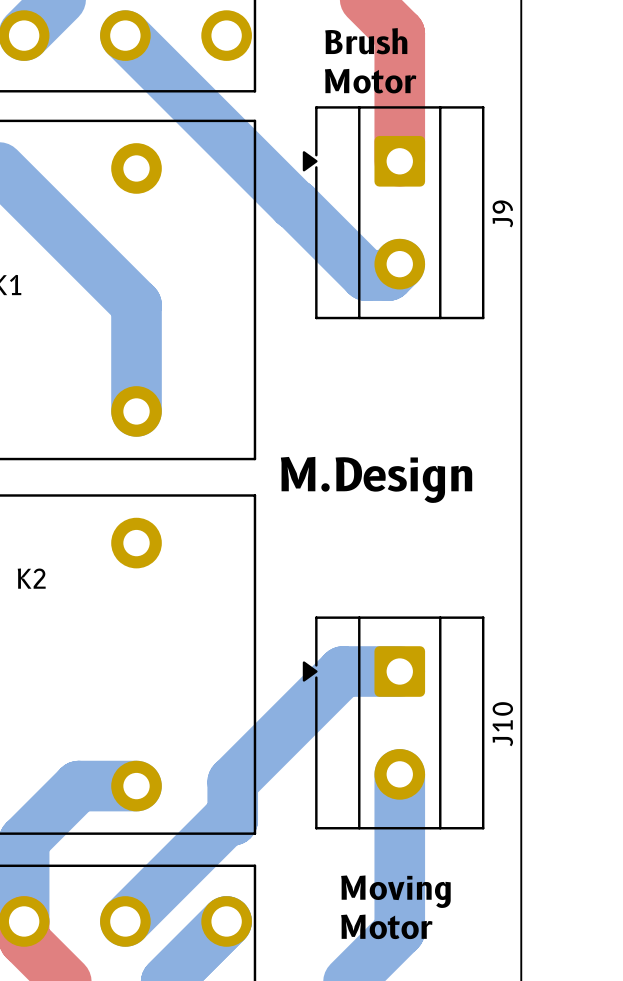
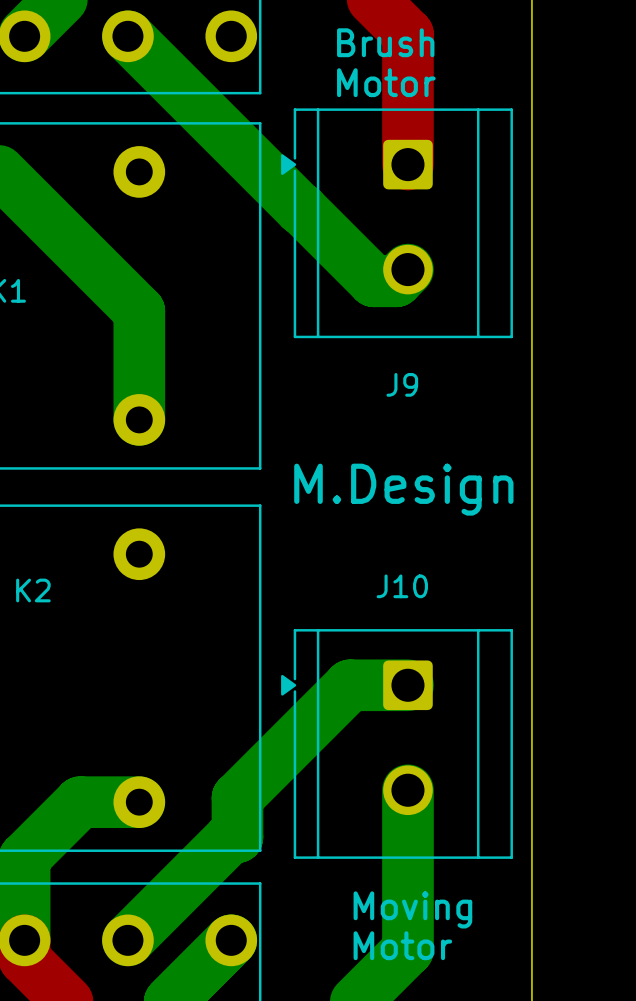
J9 footprint: [302, 106, 485, 320] -> [281, 108, 513, 339]
J9 name position: J9 (502, 213) -> J9 (402, 384)
J10 footprint: [302, 616, 485, 830] -> [281, 629, 513, 859]
J10 name position: J10 (502, 724) -> J10 (402, 586)

